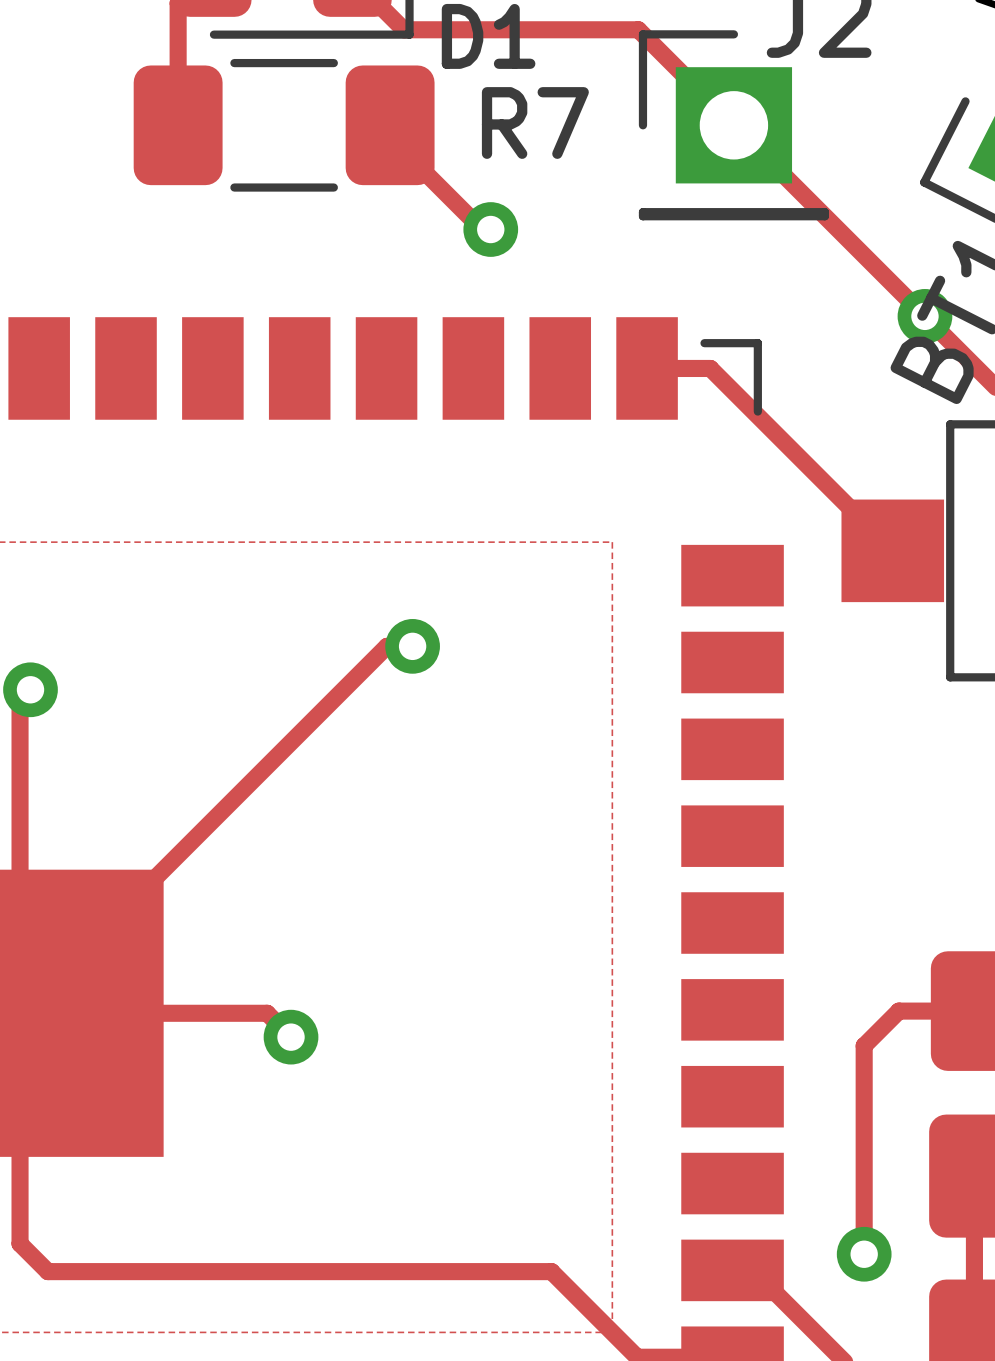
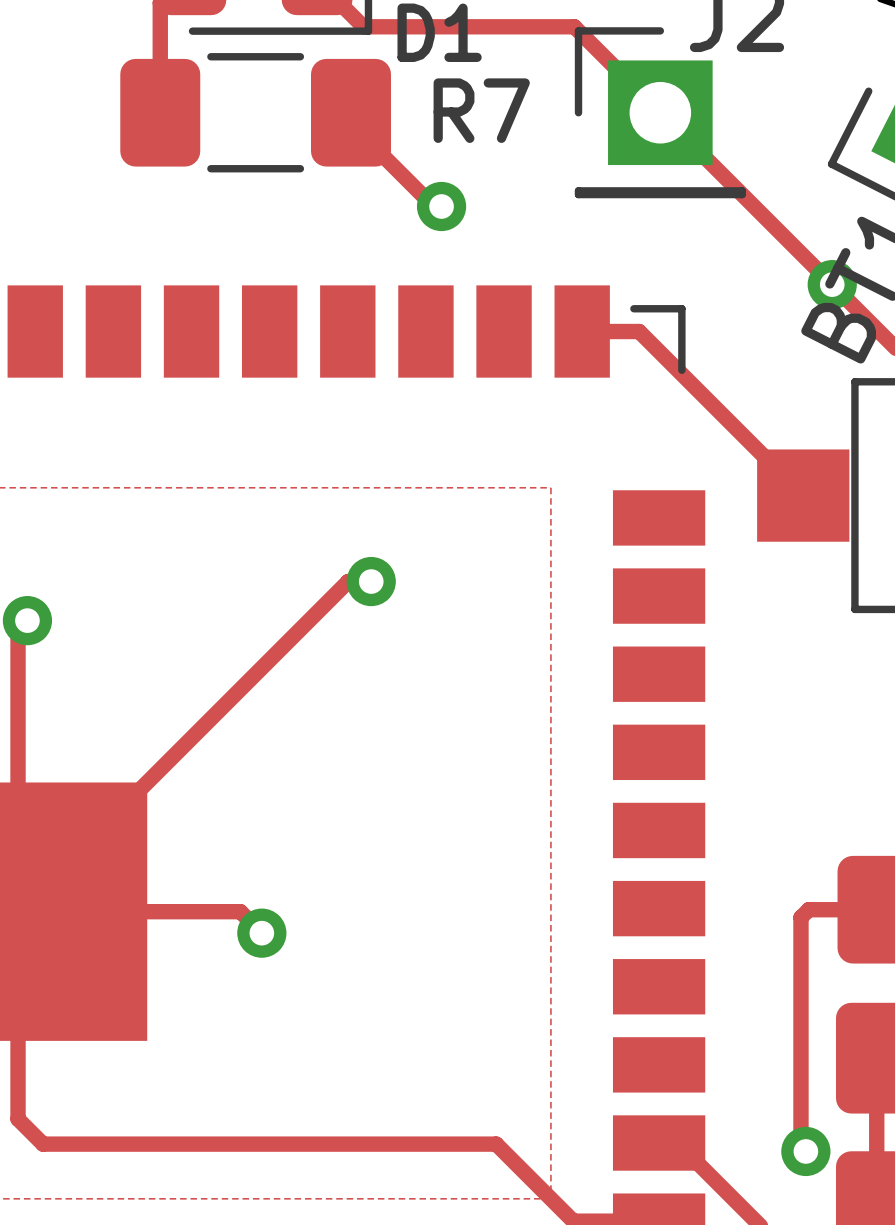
track: (890, 1019) (864, 1045) (864, 1254) -> (800, 917) (800, 1146) (805, 1151)
via position: (864, 1254) -> (805, 1151)

